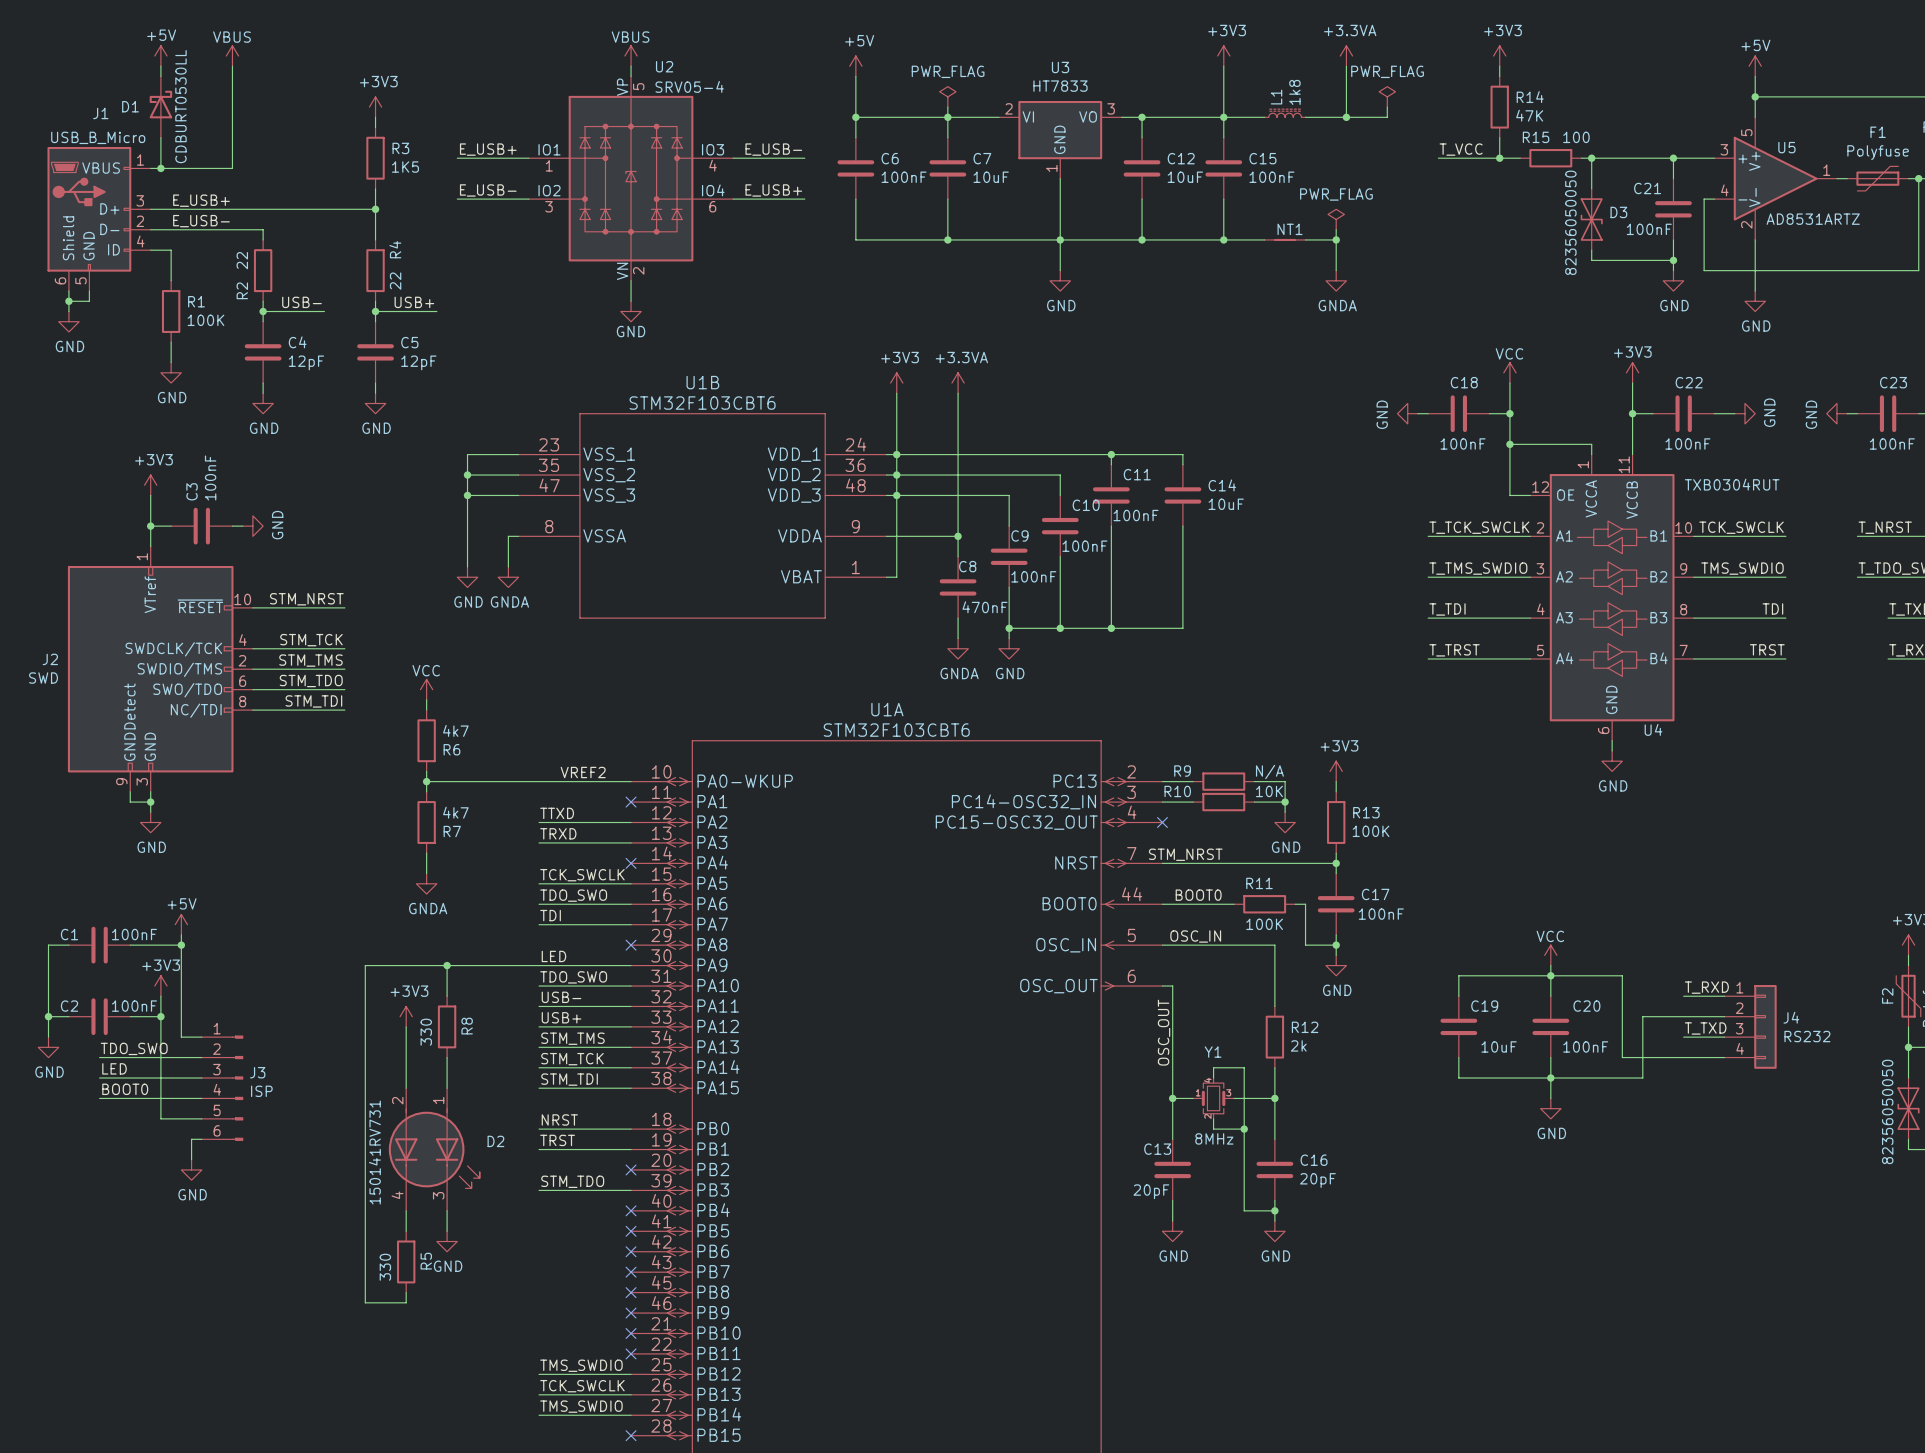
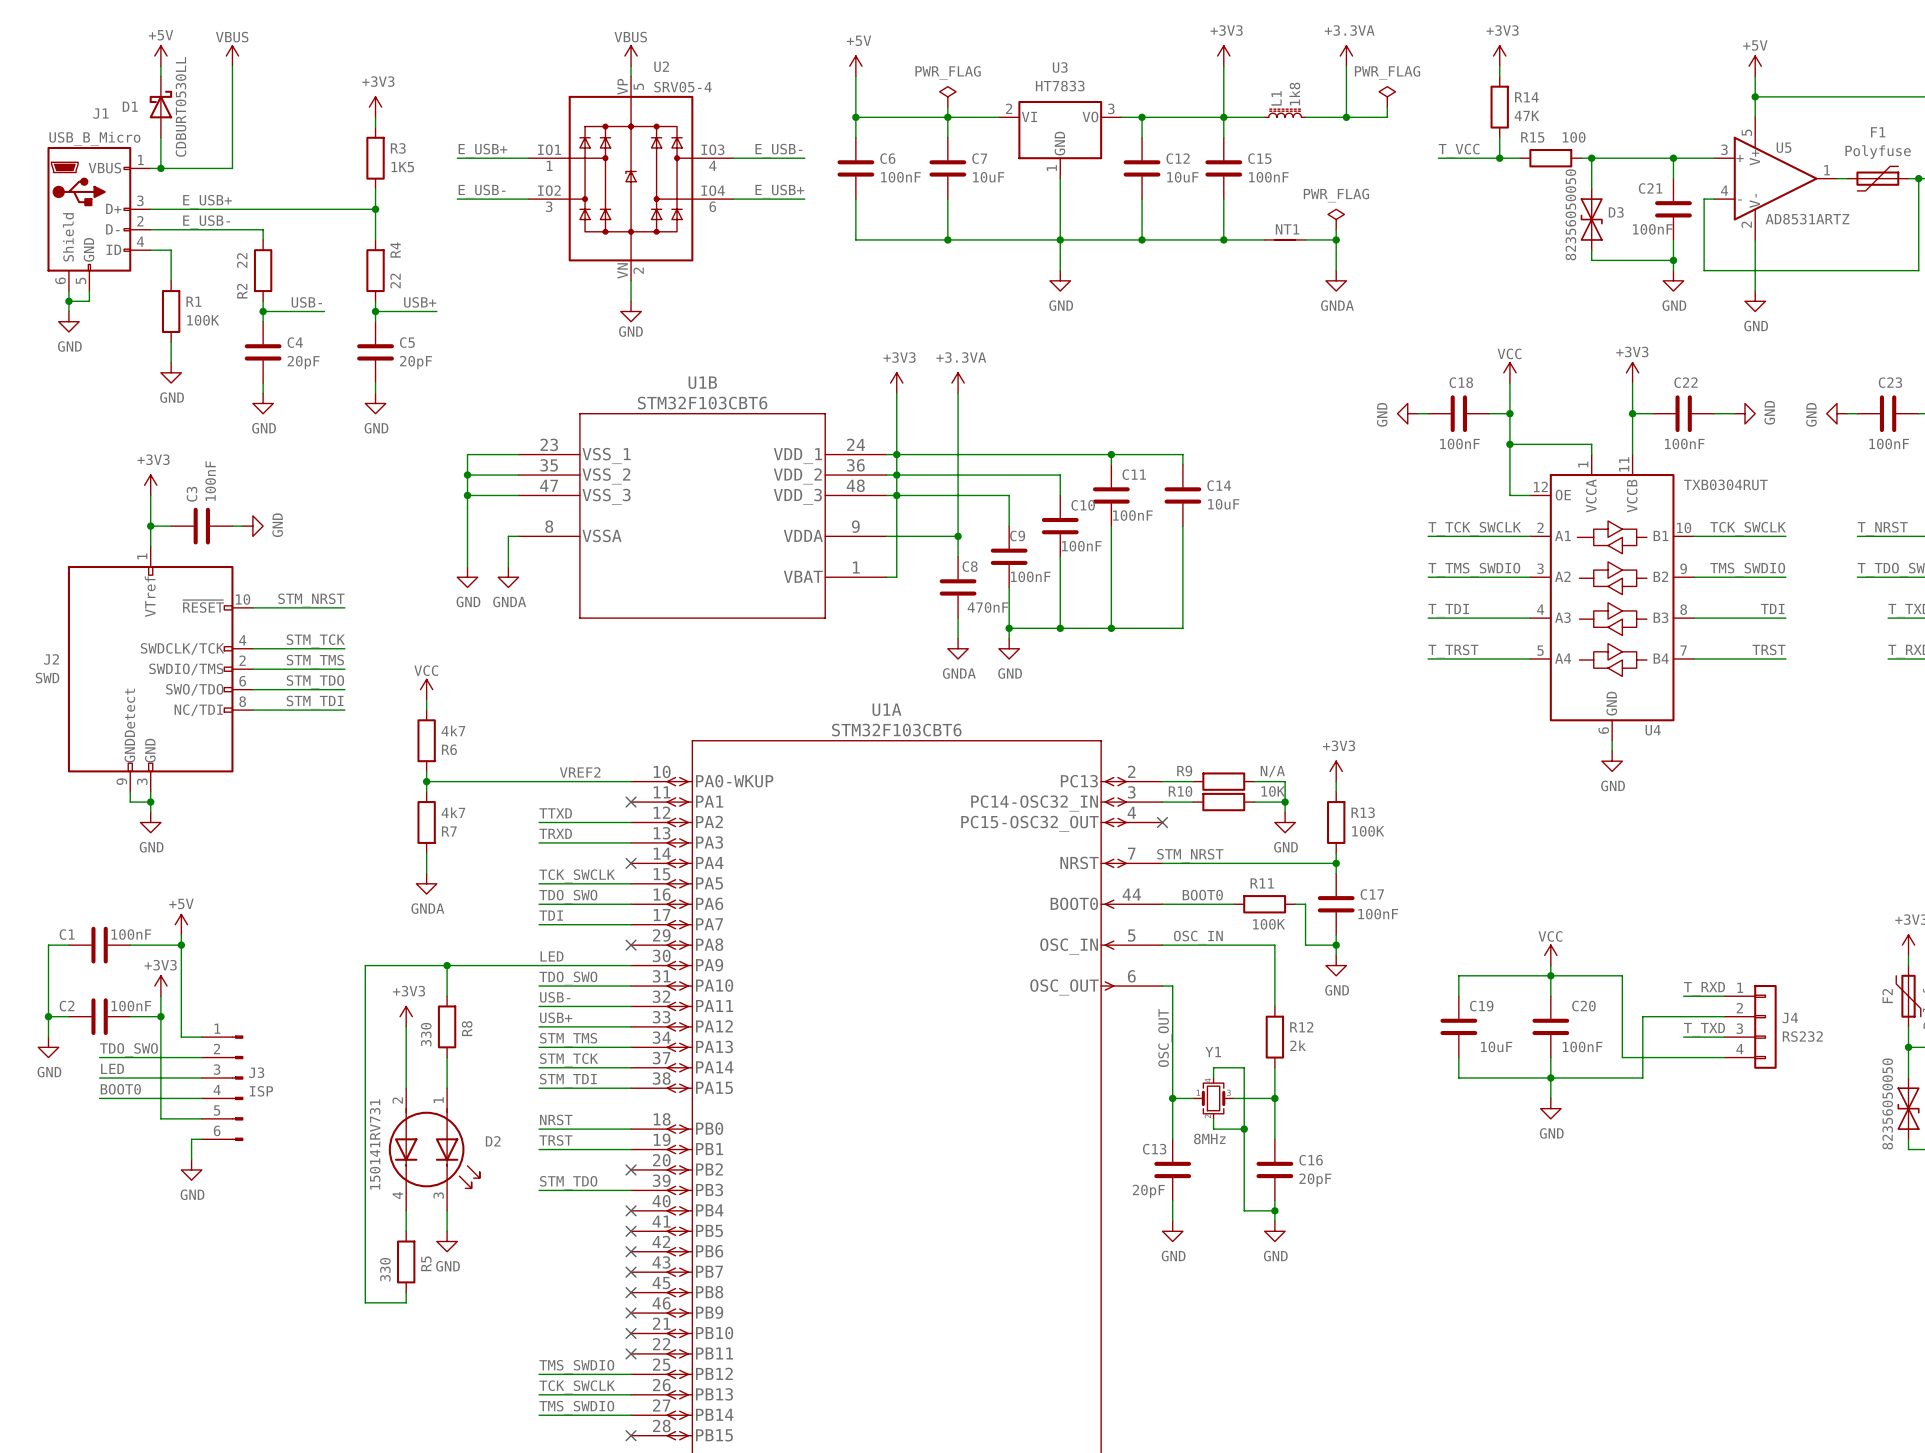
C4 value: 12pF (306, 362) -> 20pF (303, 362)
C5 value: 12pF (418, 362) -> 20pF (416, 362)

